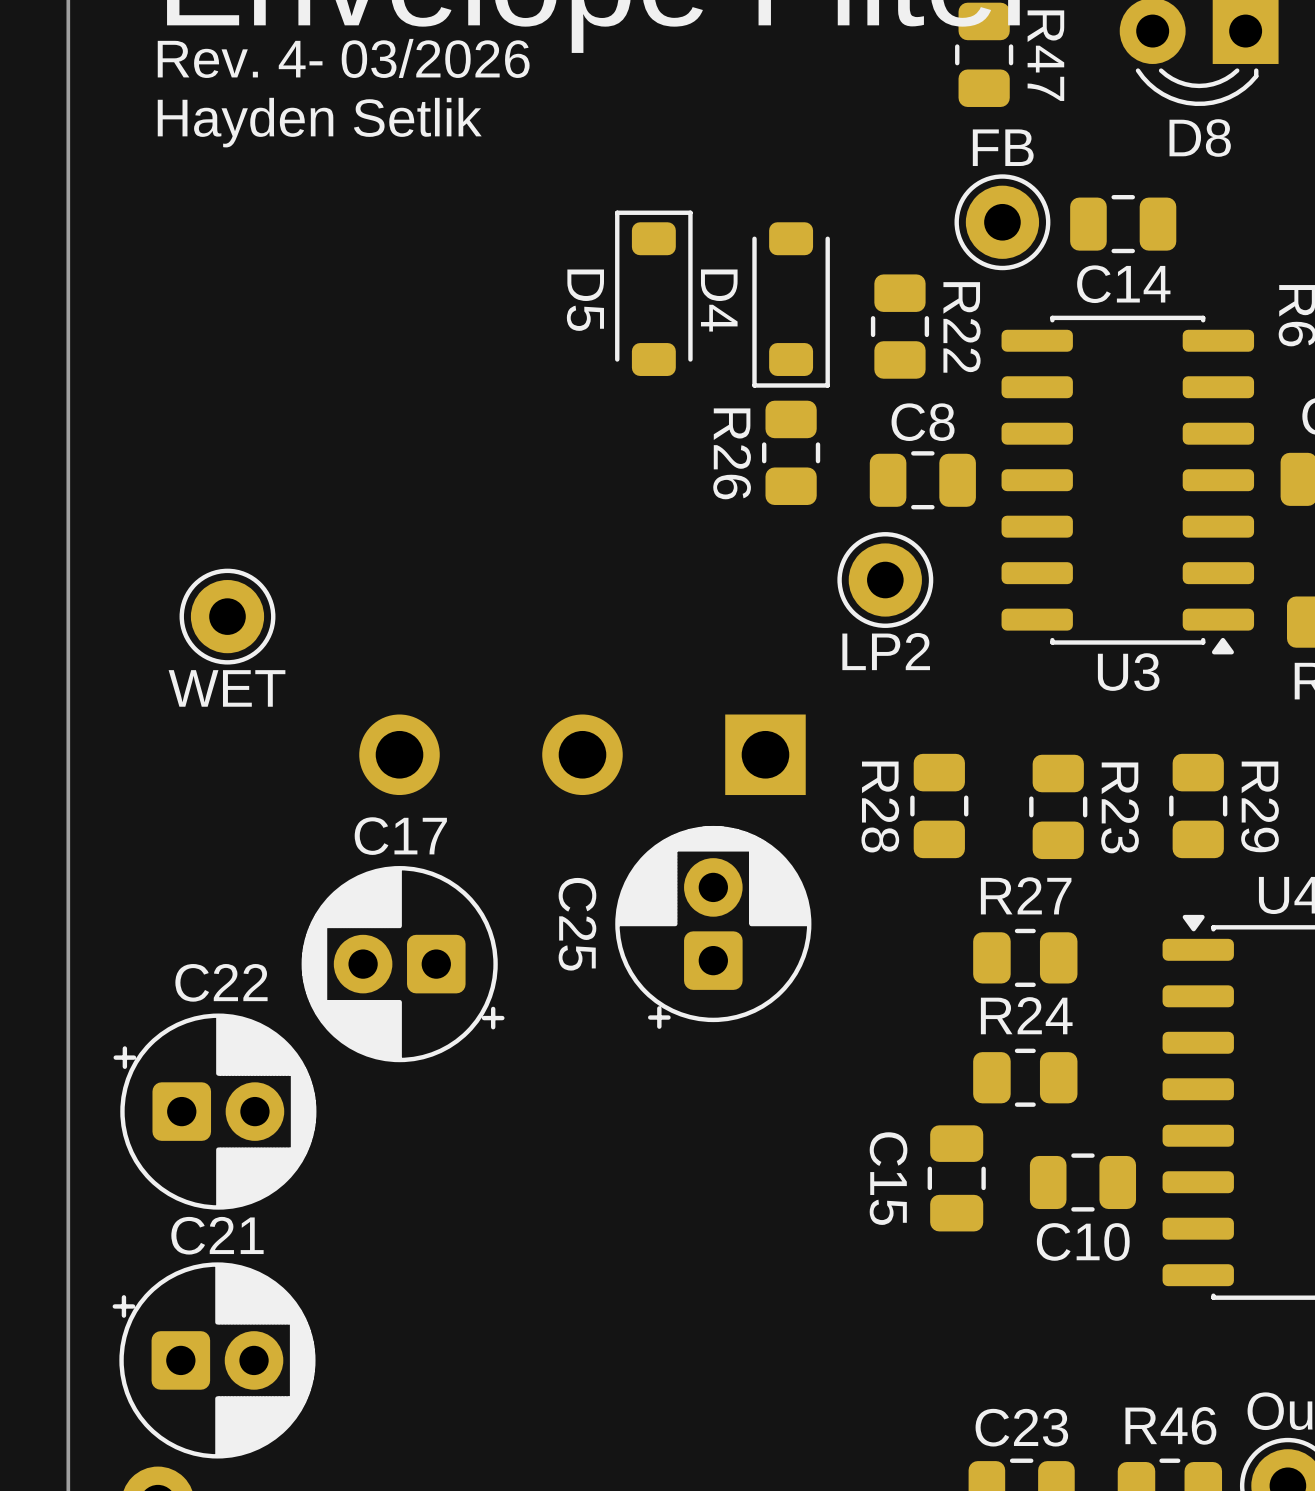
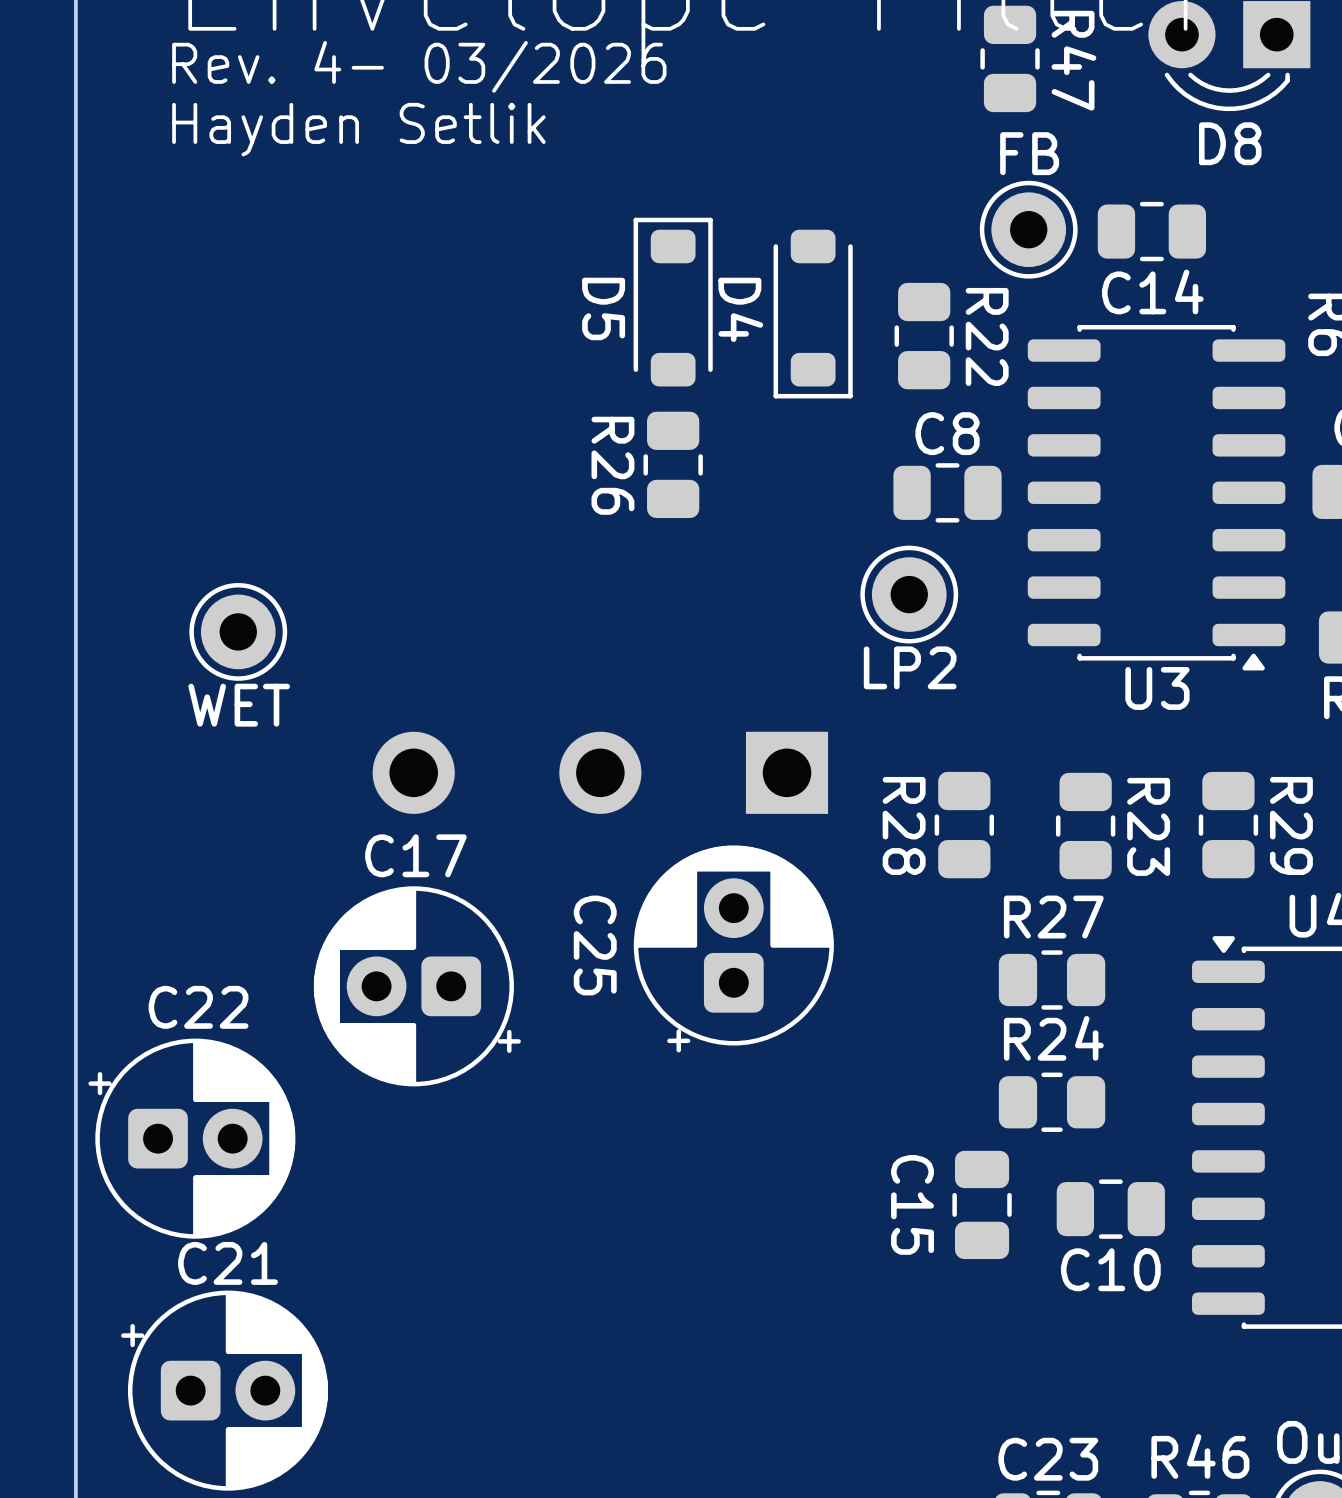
R26 position: (791, 452) -> (673, 464)
C22 position: (214, 1111) -> (191, 1138)

